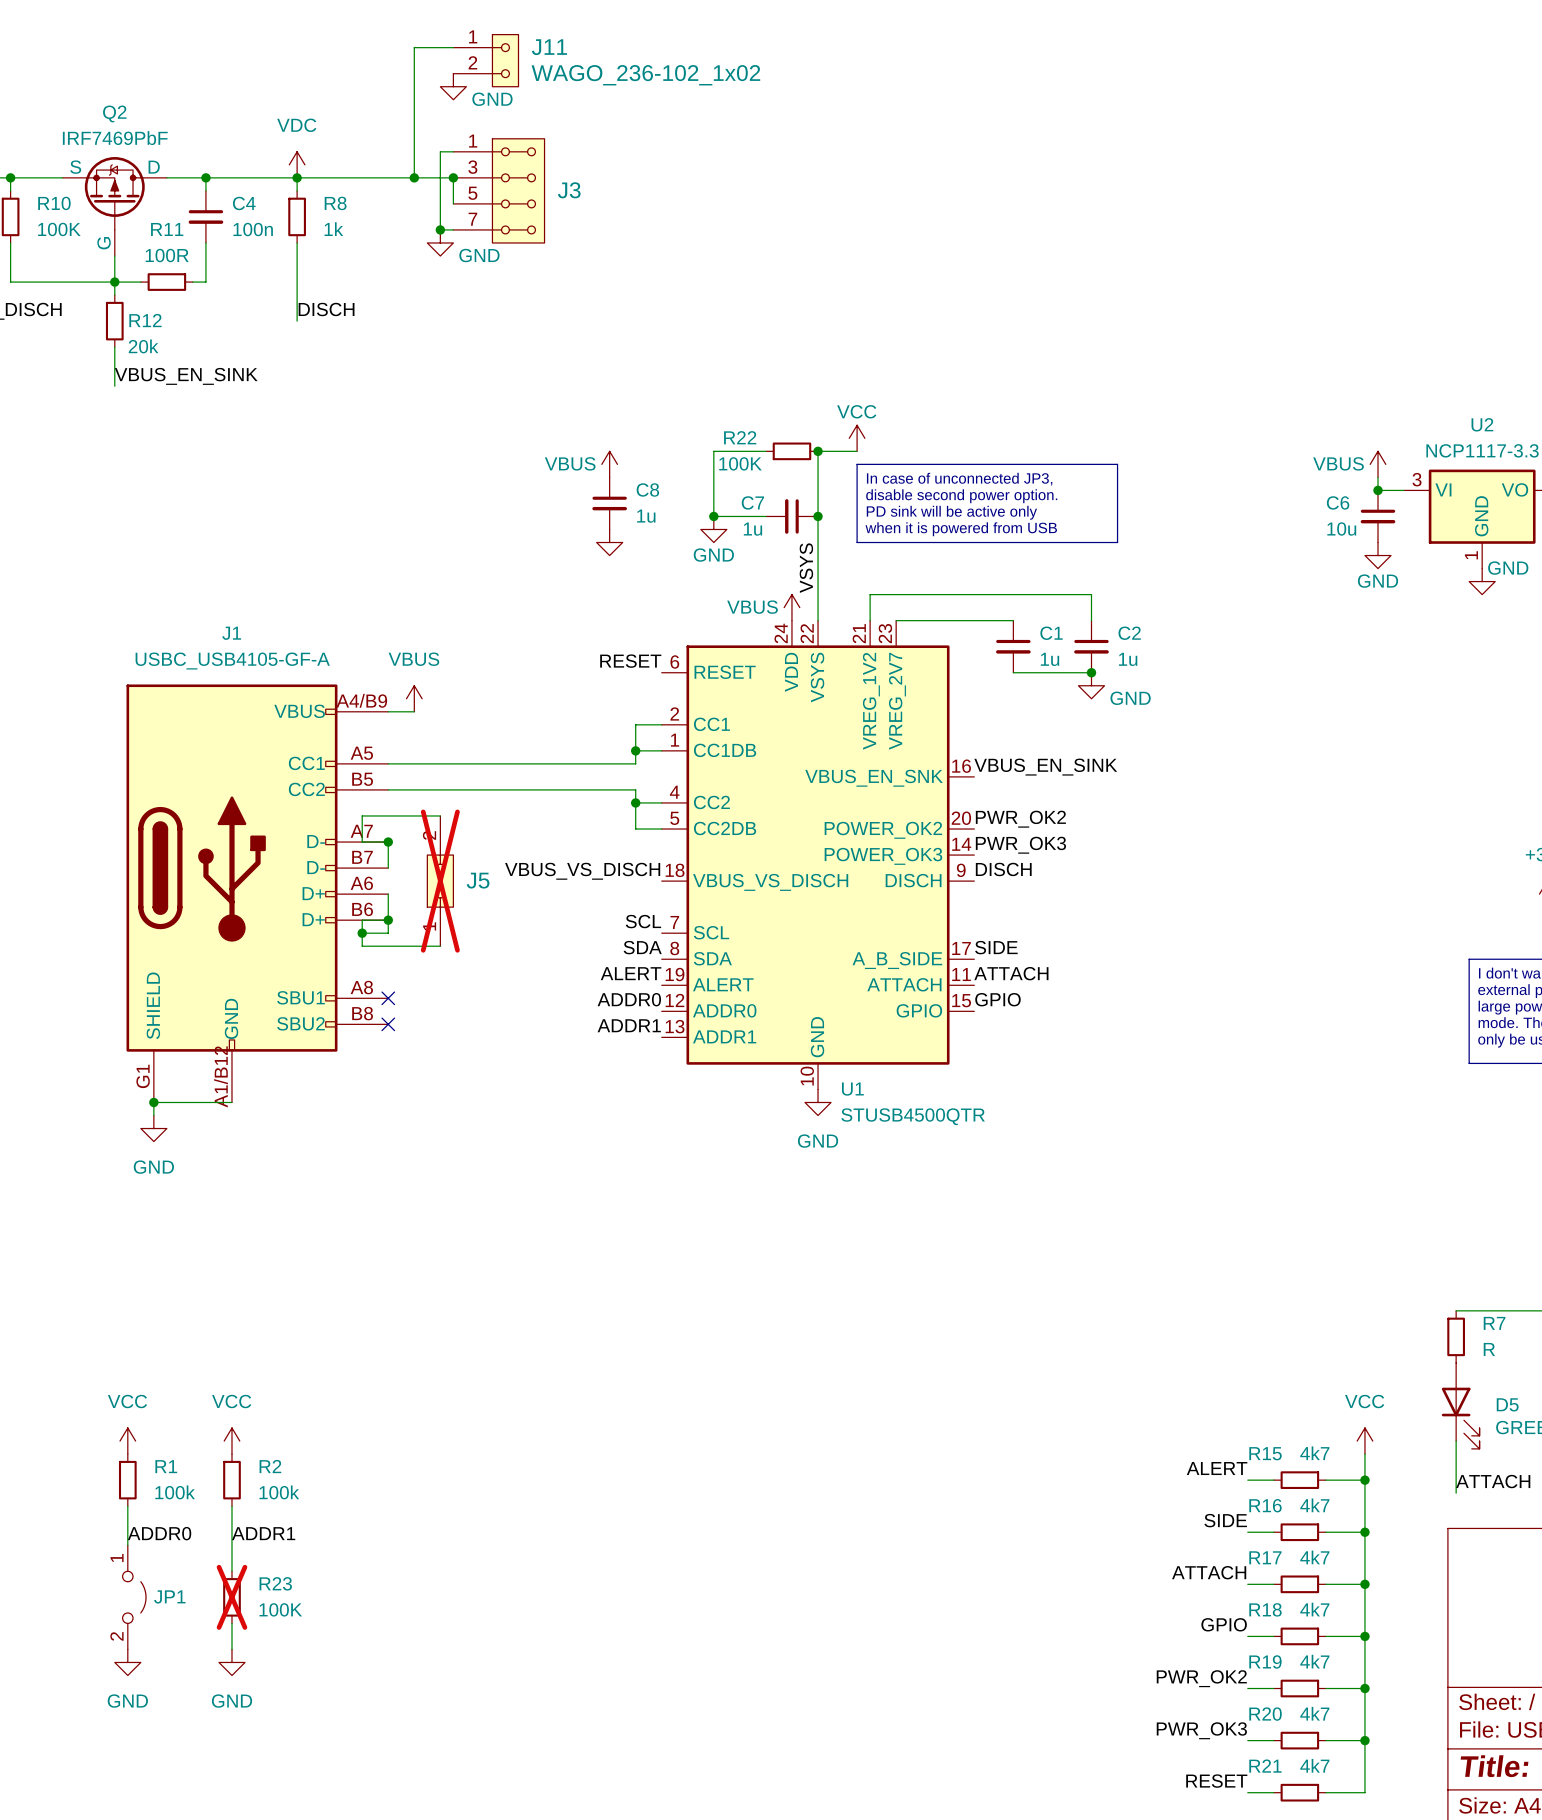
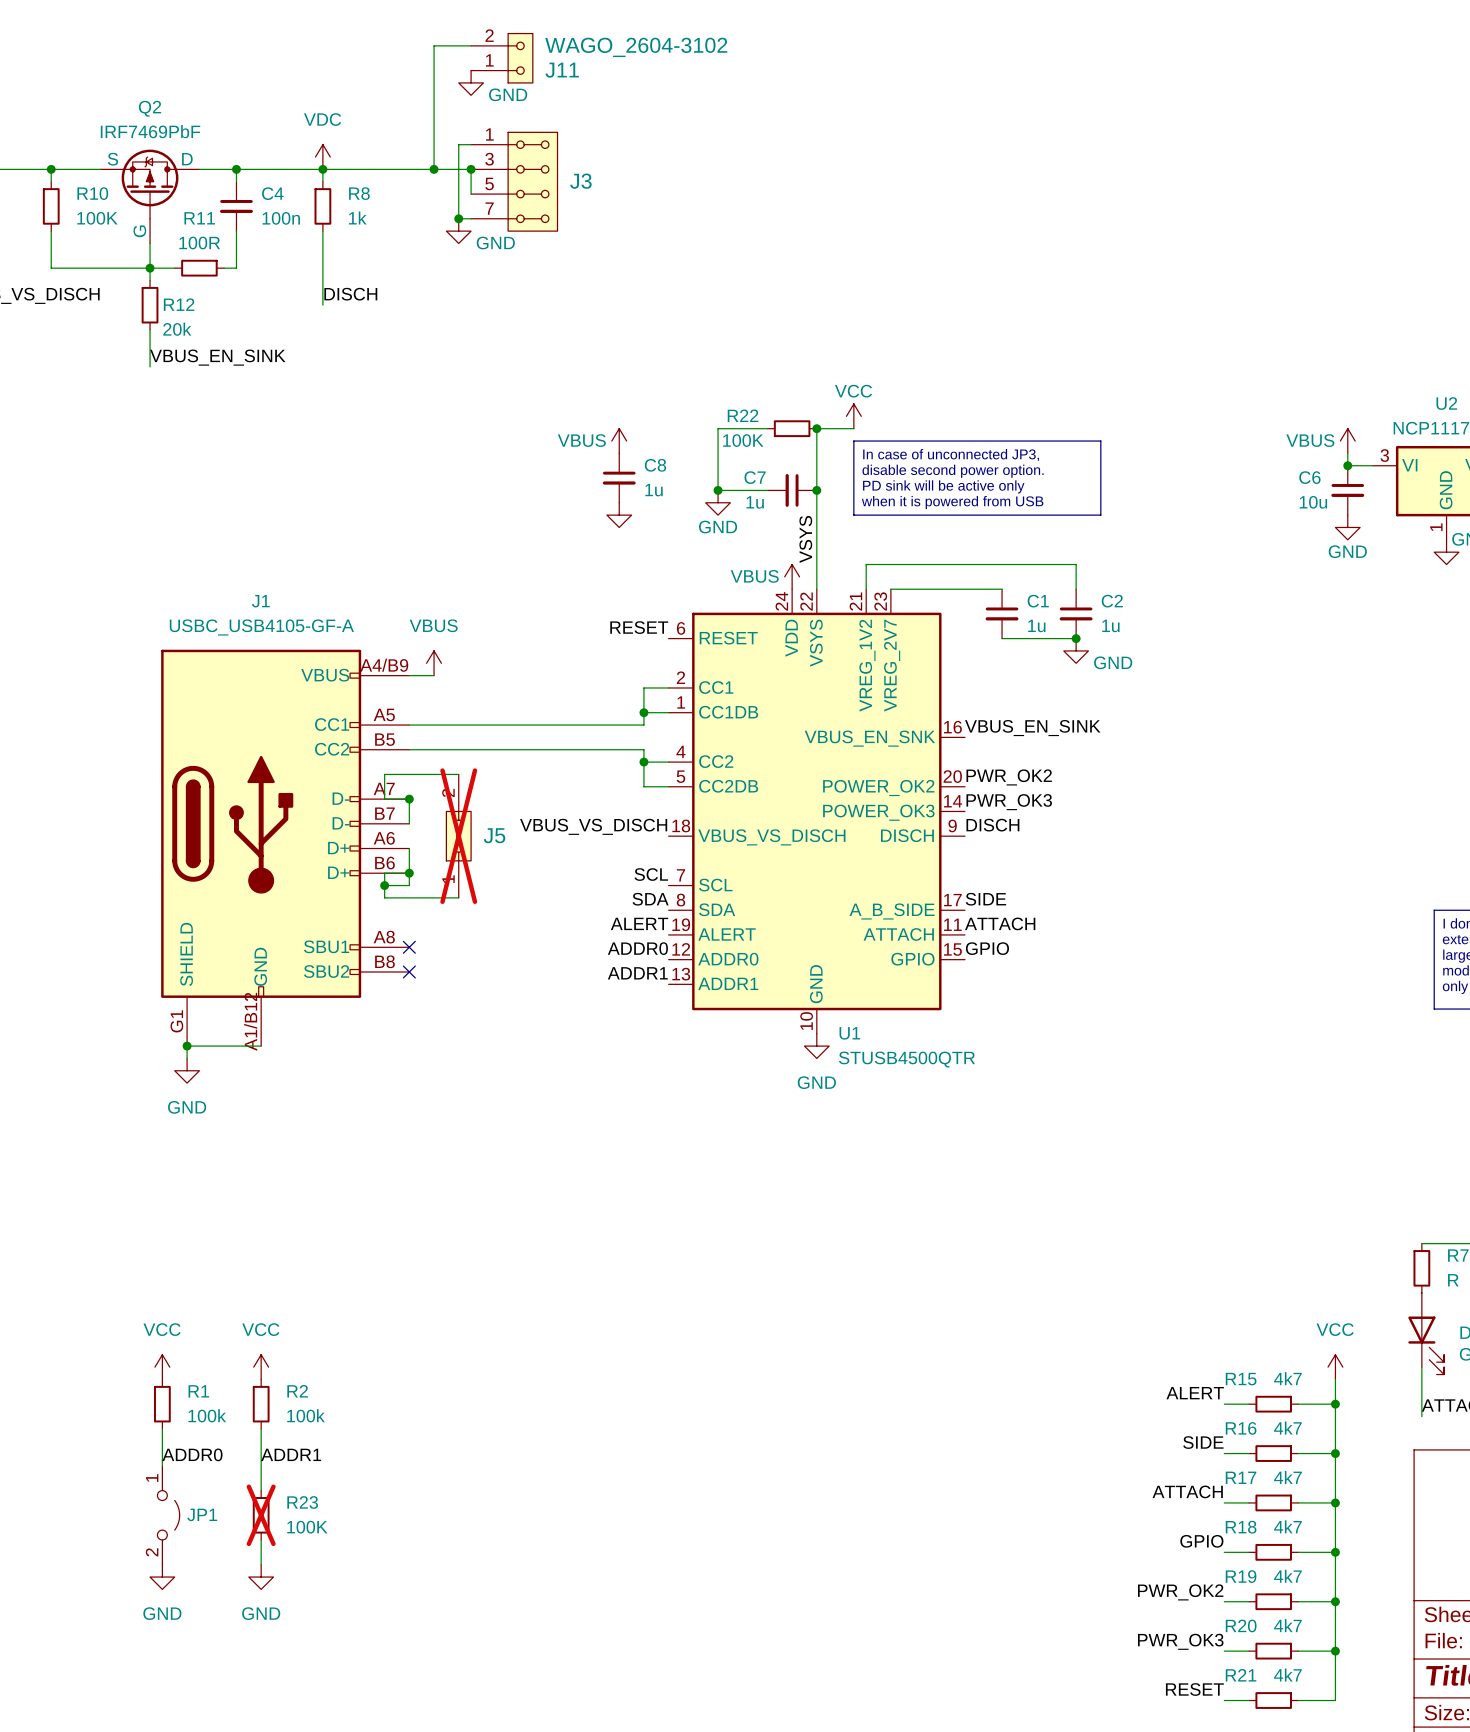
J11 flip: as is (505, 60) -> up-down (520, 58)
J11 value: WAGO_236-102_1x02 (645, 75) -> WAGO_2604-3102 (636, 47)

